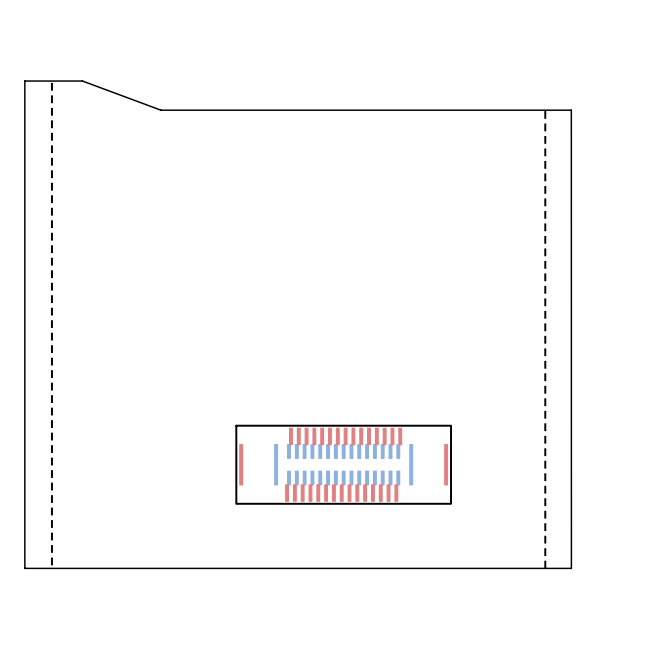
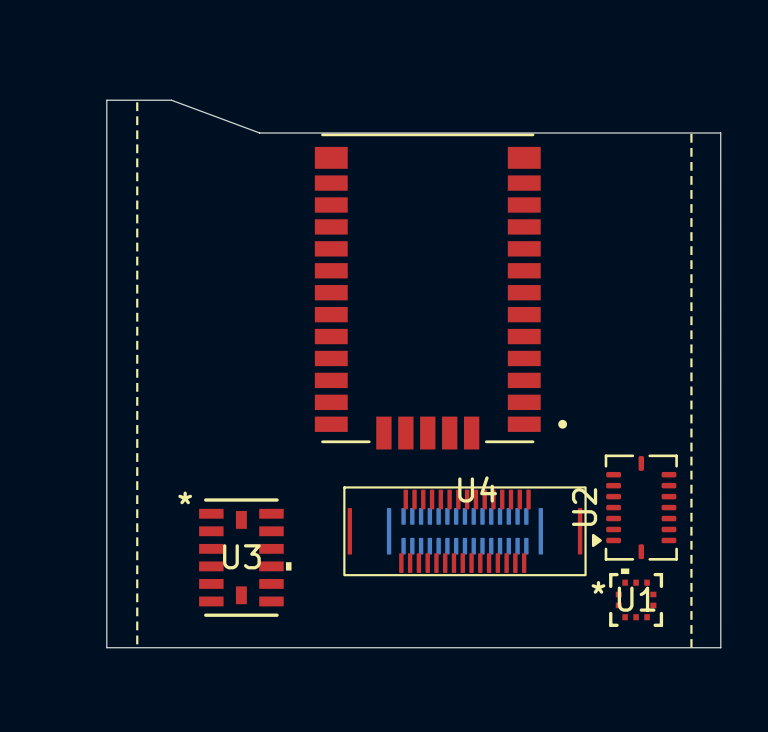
U4: none -> (440, 291)
U2: none -> (634, 507)
U3: none -> (245, 557)
U1: none -> (636, 597)

